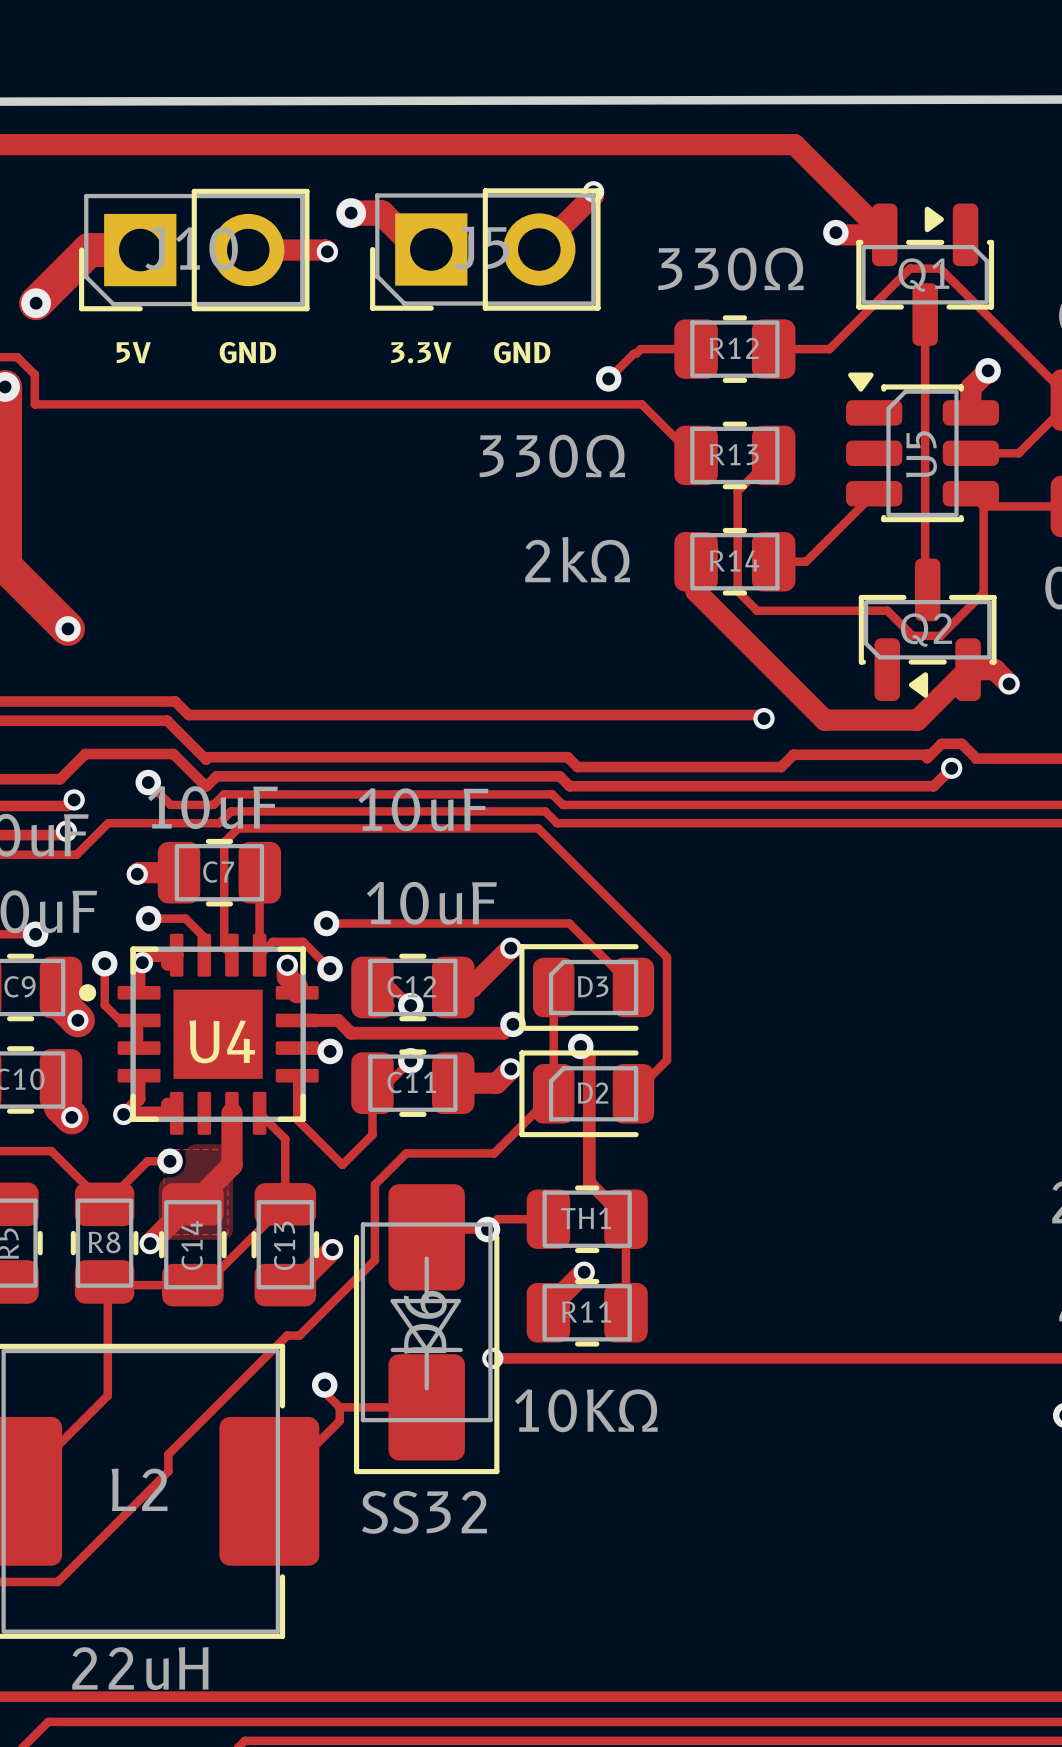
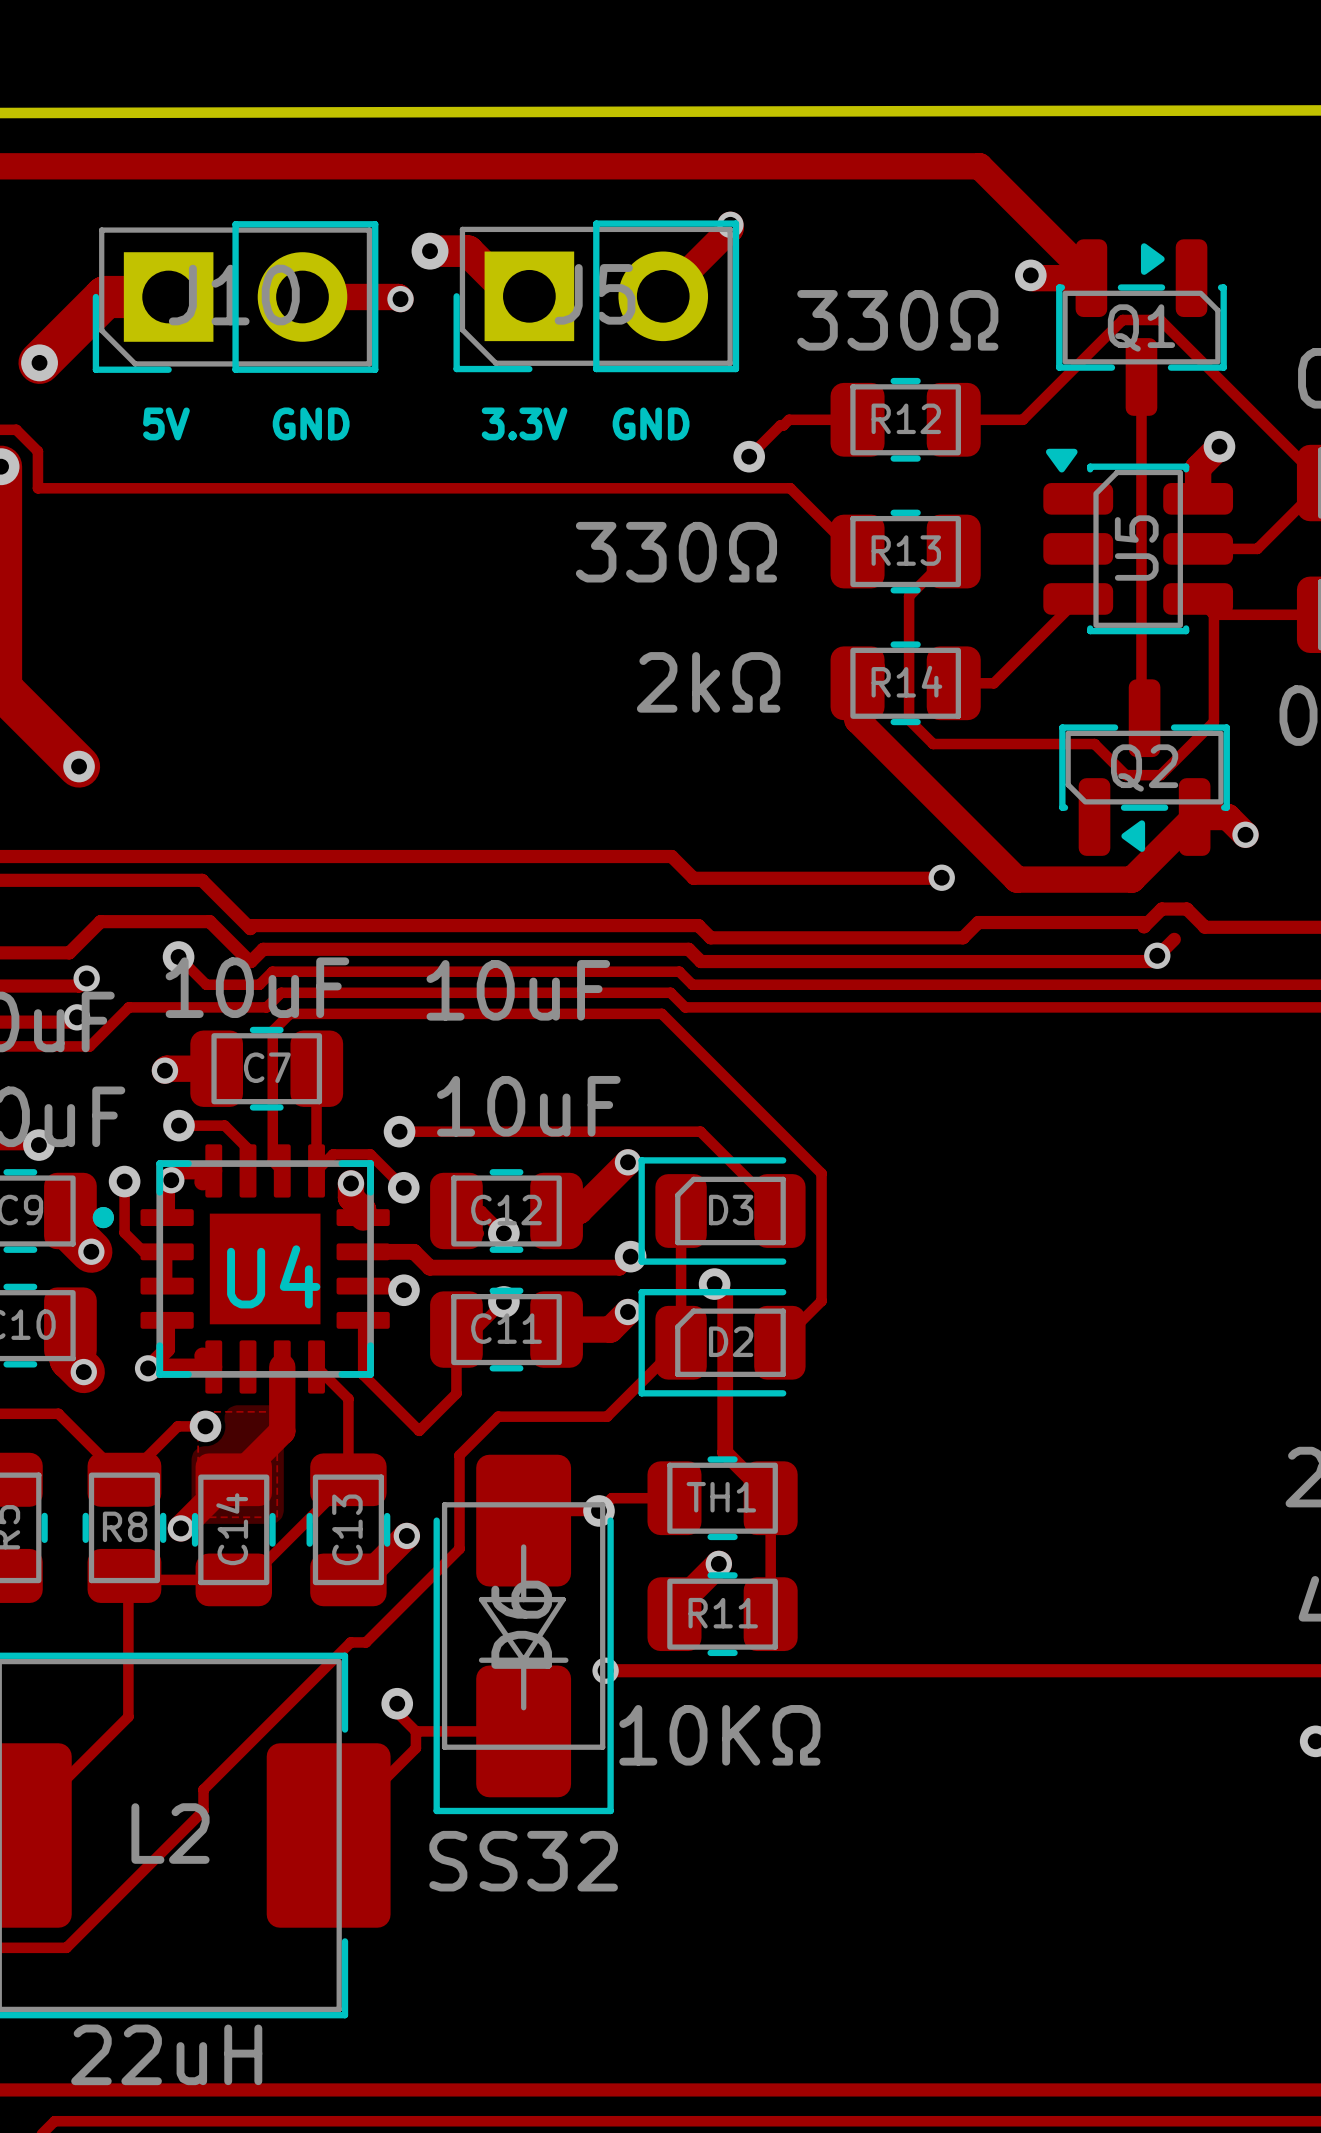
track: (175, 701) (188, 715) (760, 715) (764, 718) -> (211, 856) (671, 856) (693, 878) (941, 878)
via position: (951, 768) -> (1157, 955)

